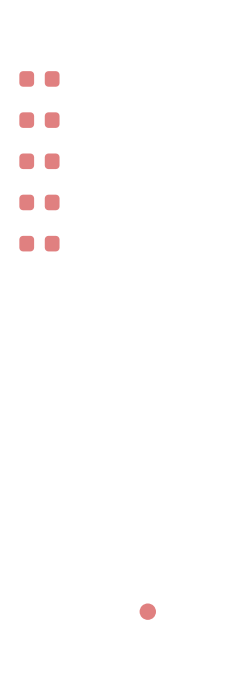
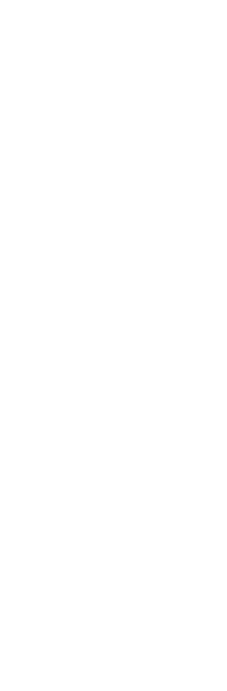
part: (39, 78) -> none
part: (39, 120) -> none
part: (39, 161) -> none
part: (39, 202) -> none
part: (39, 243) -> none
part: (147, 611) -> none

